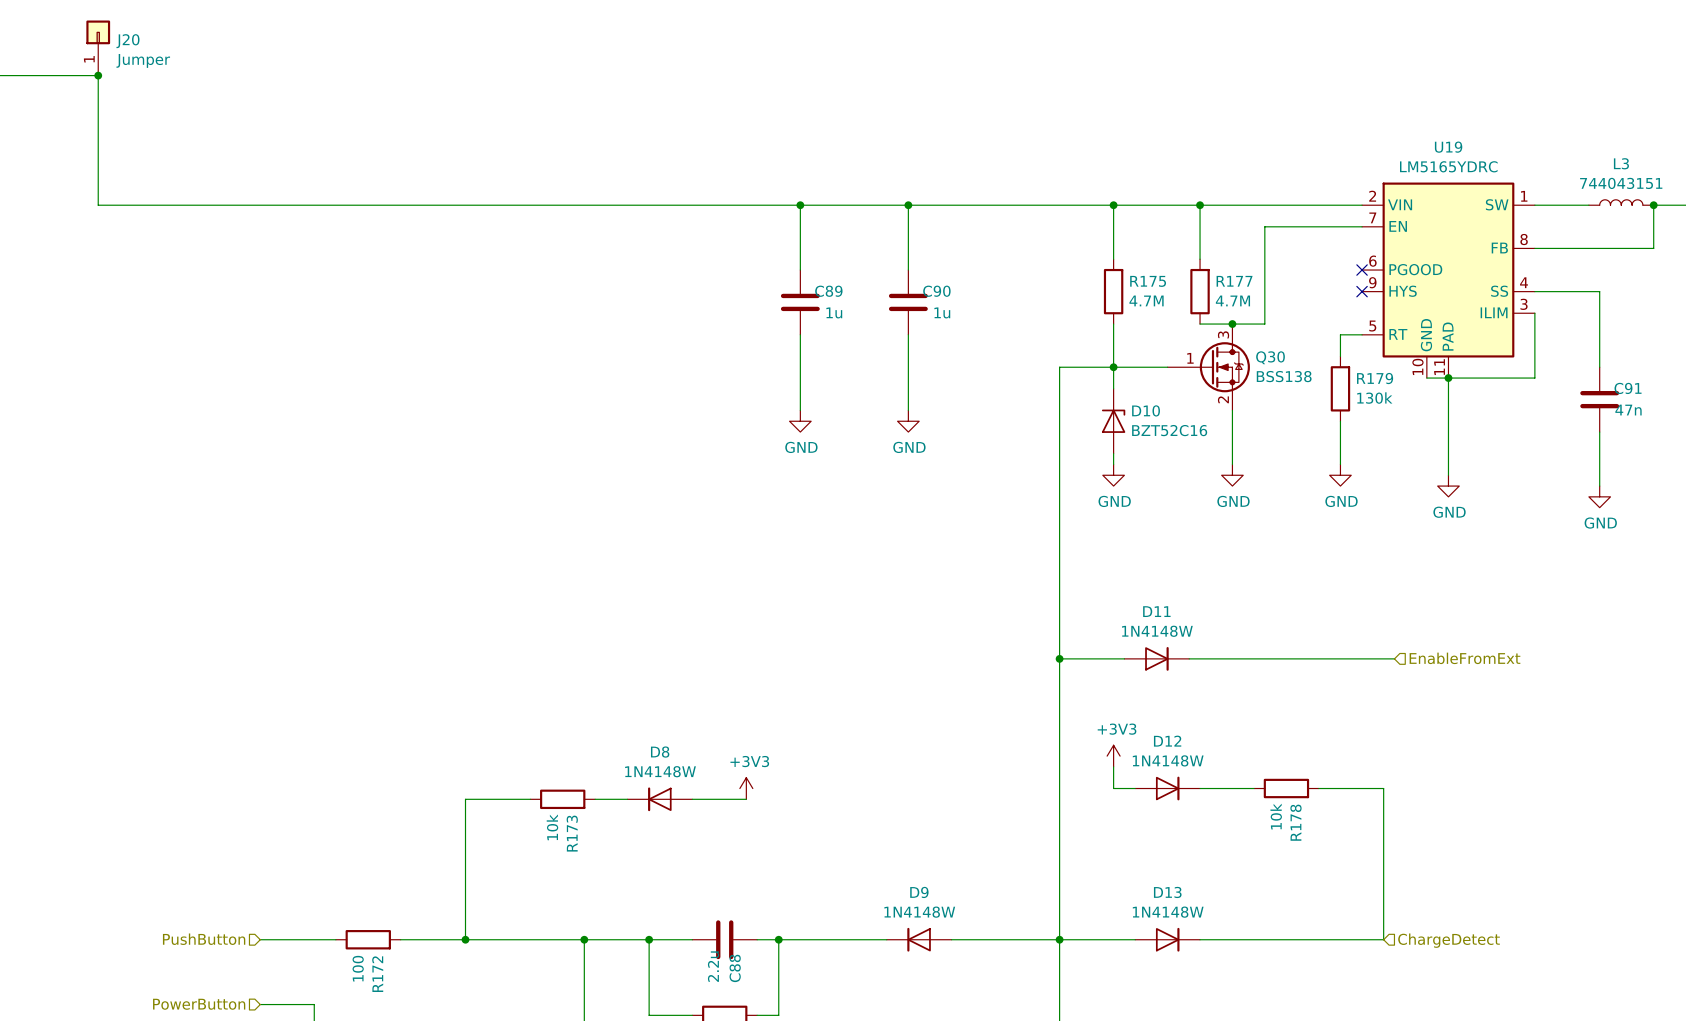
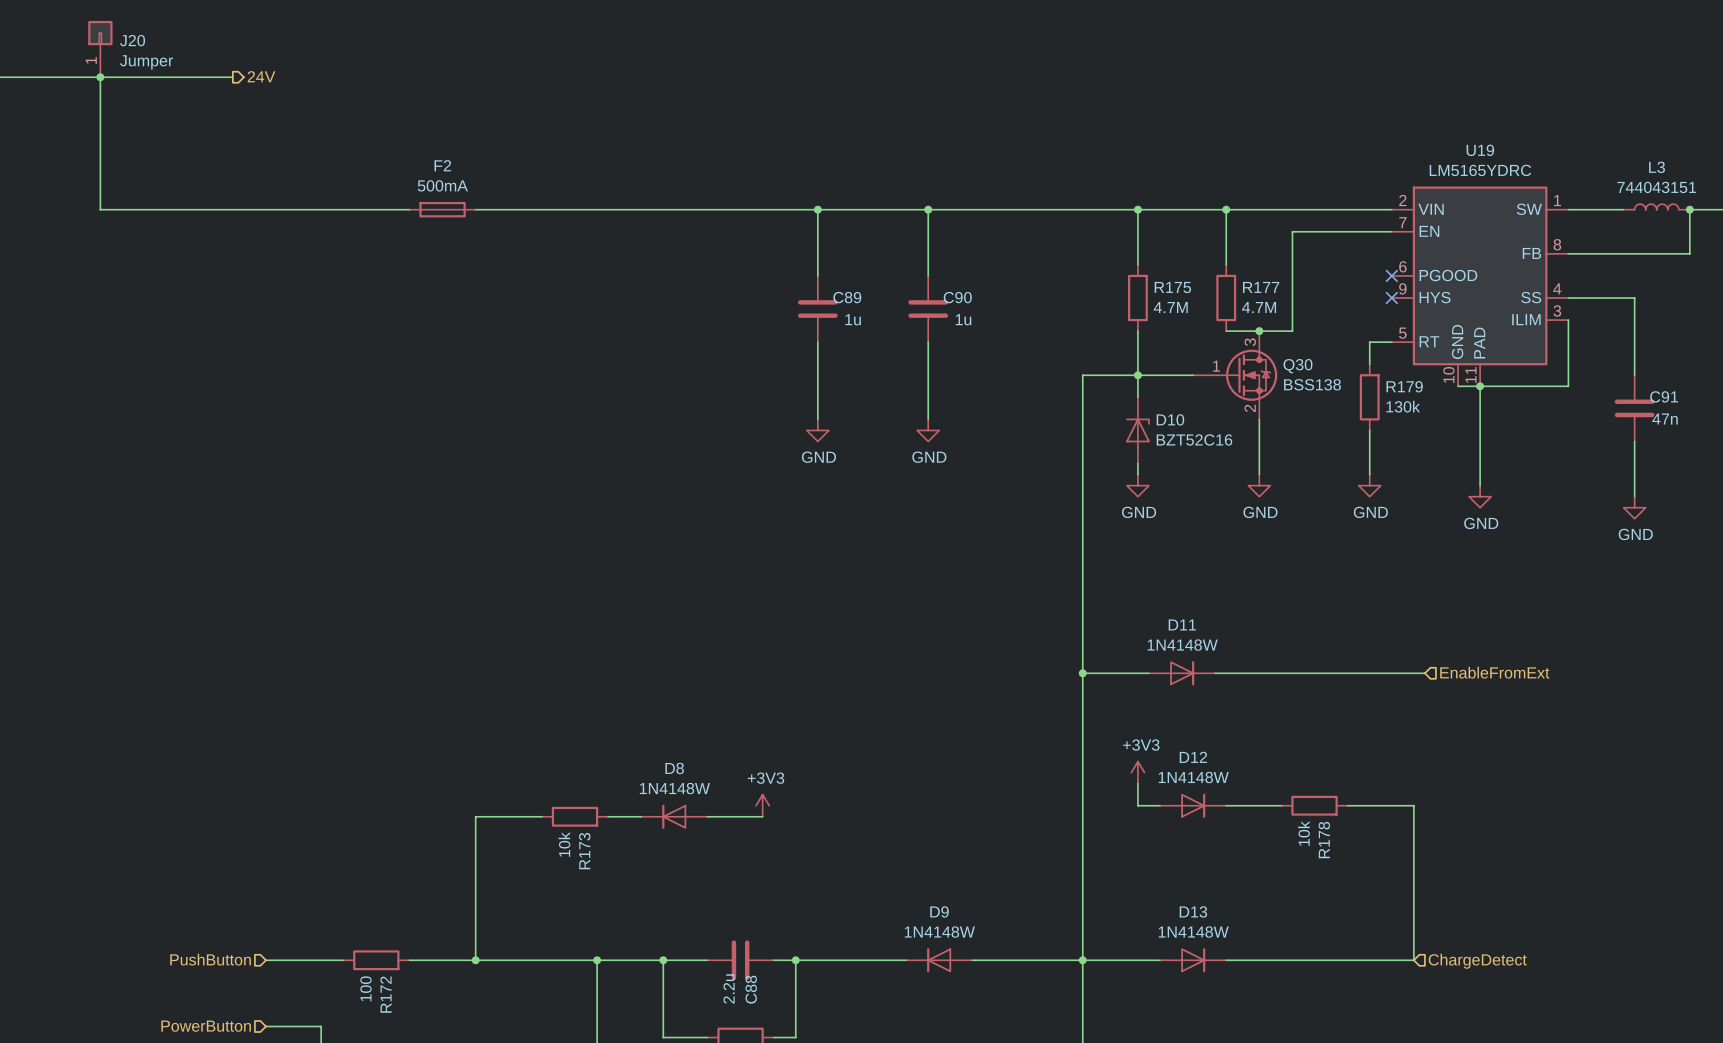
wire: none -> (100, 77) (232, 77)
hierarchical label: none -> 24V (261, 76)
F2: none -> 500mA (442, 209)

